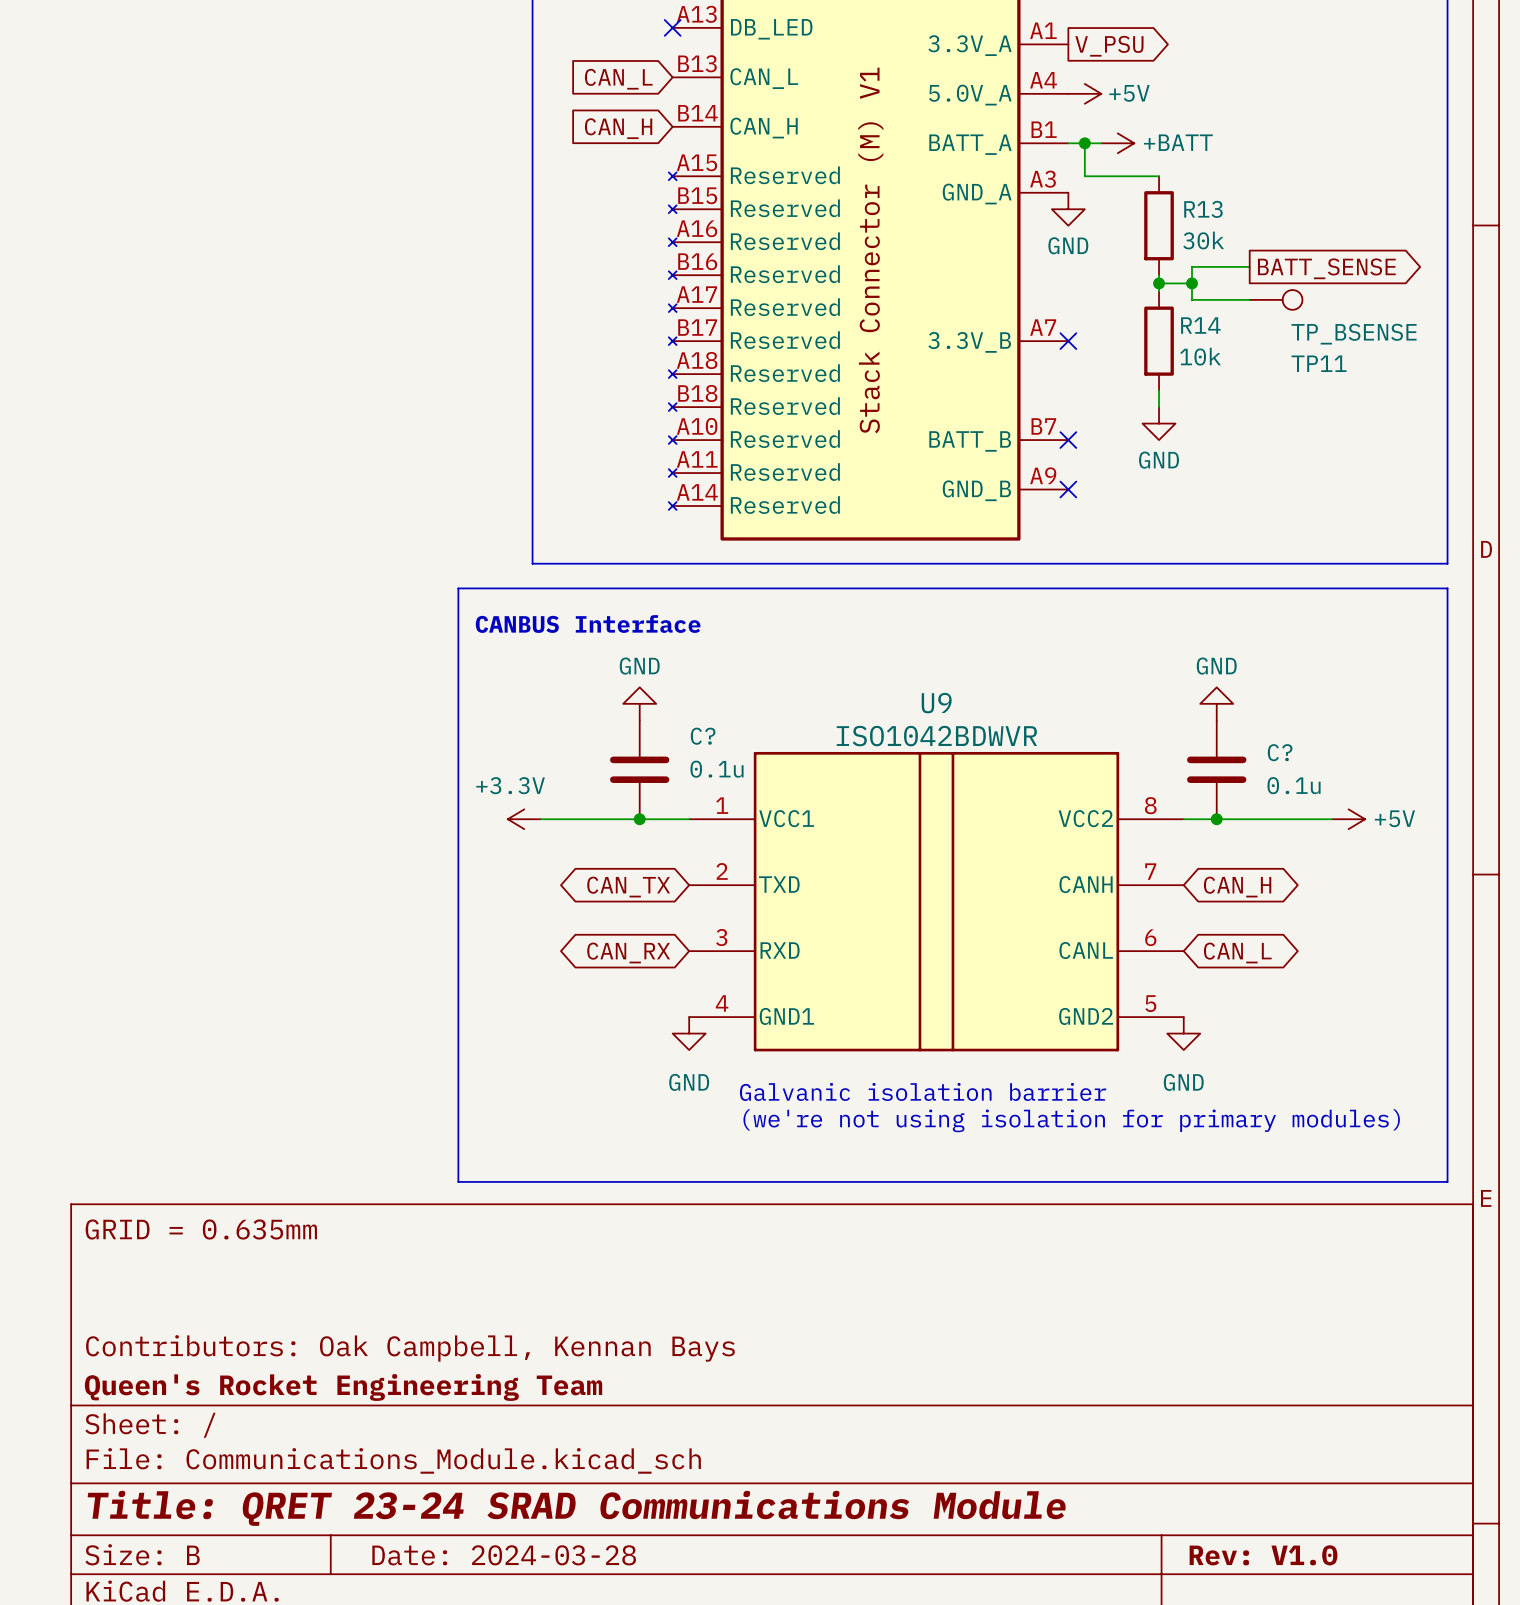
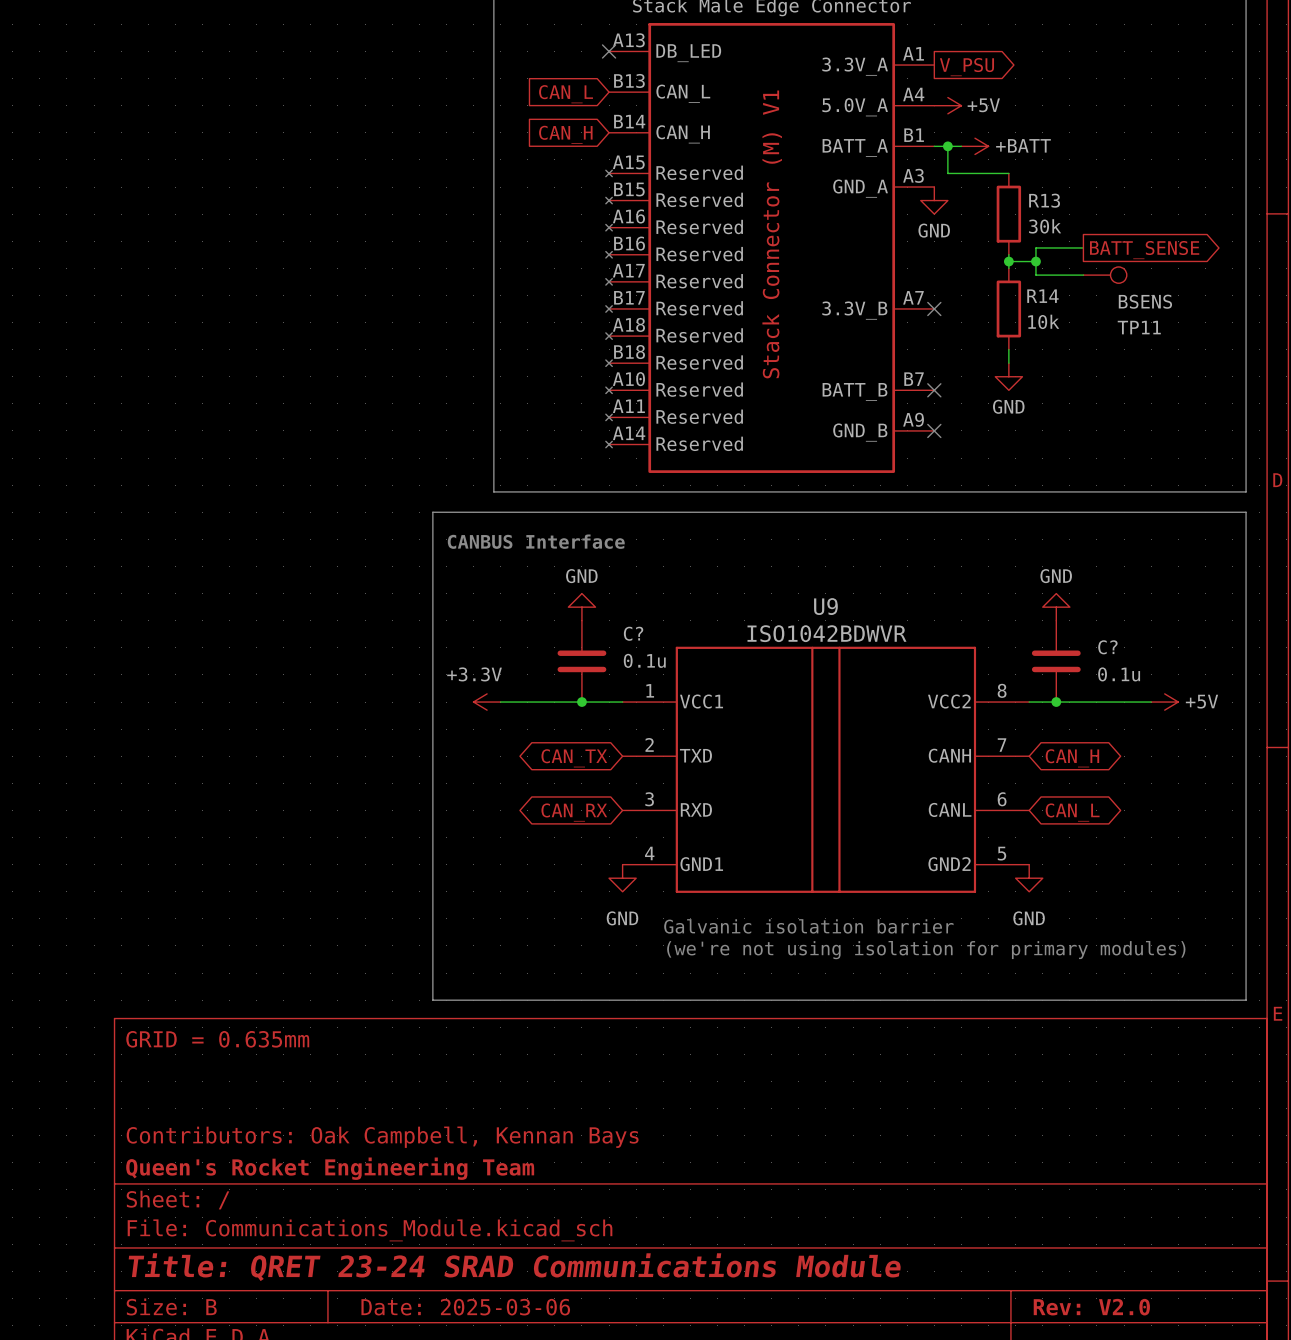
TP11 value: TP_BSENSE (1354, 334) -> BSENS (1145, 301)
title block: Date: 2024-03-28 (504, 1555) -> Date: 2025-03-06 (465, 1307)
title block: Rev: V1.0 (1263, 1555) -> Rev: V2.0 (1091, 1307)

